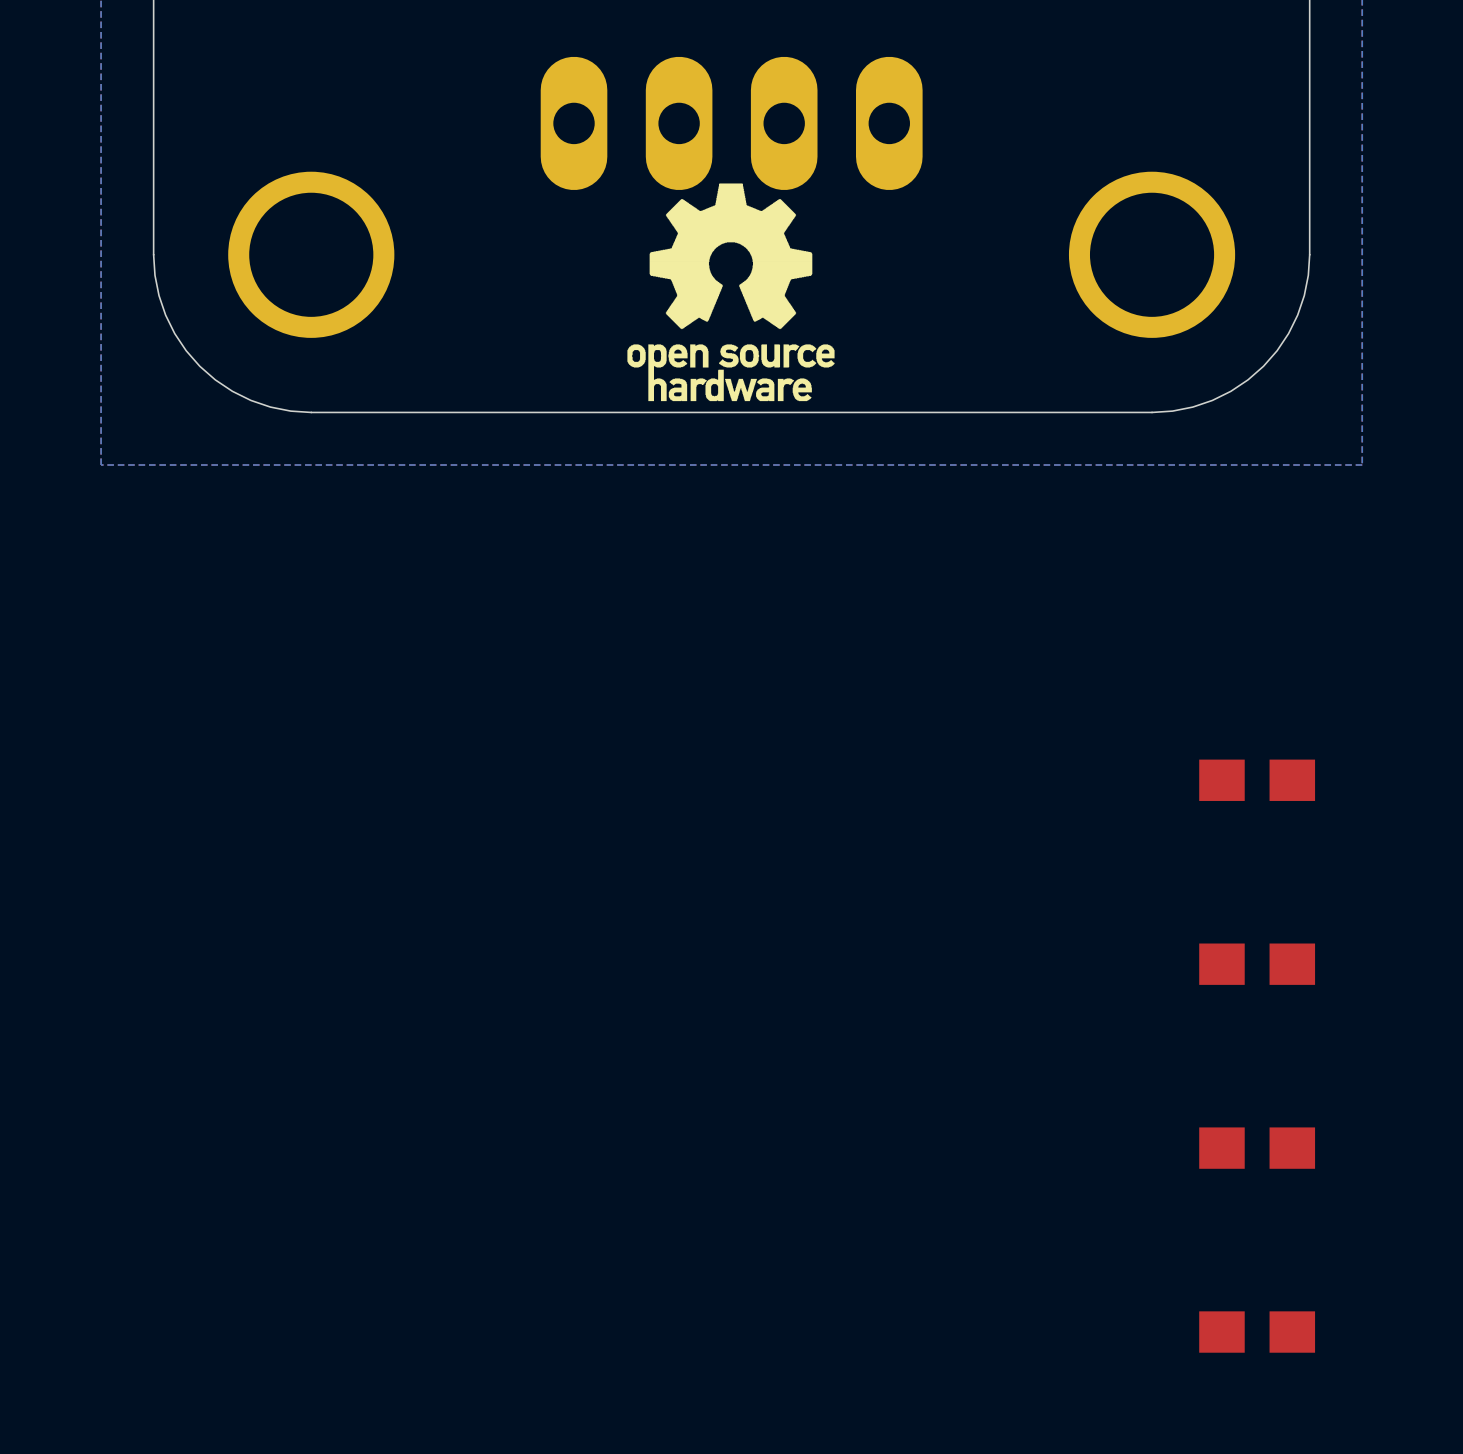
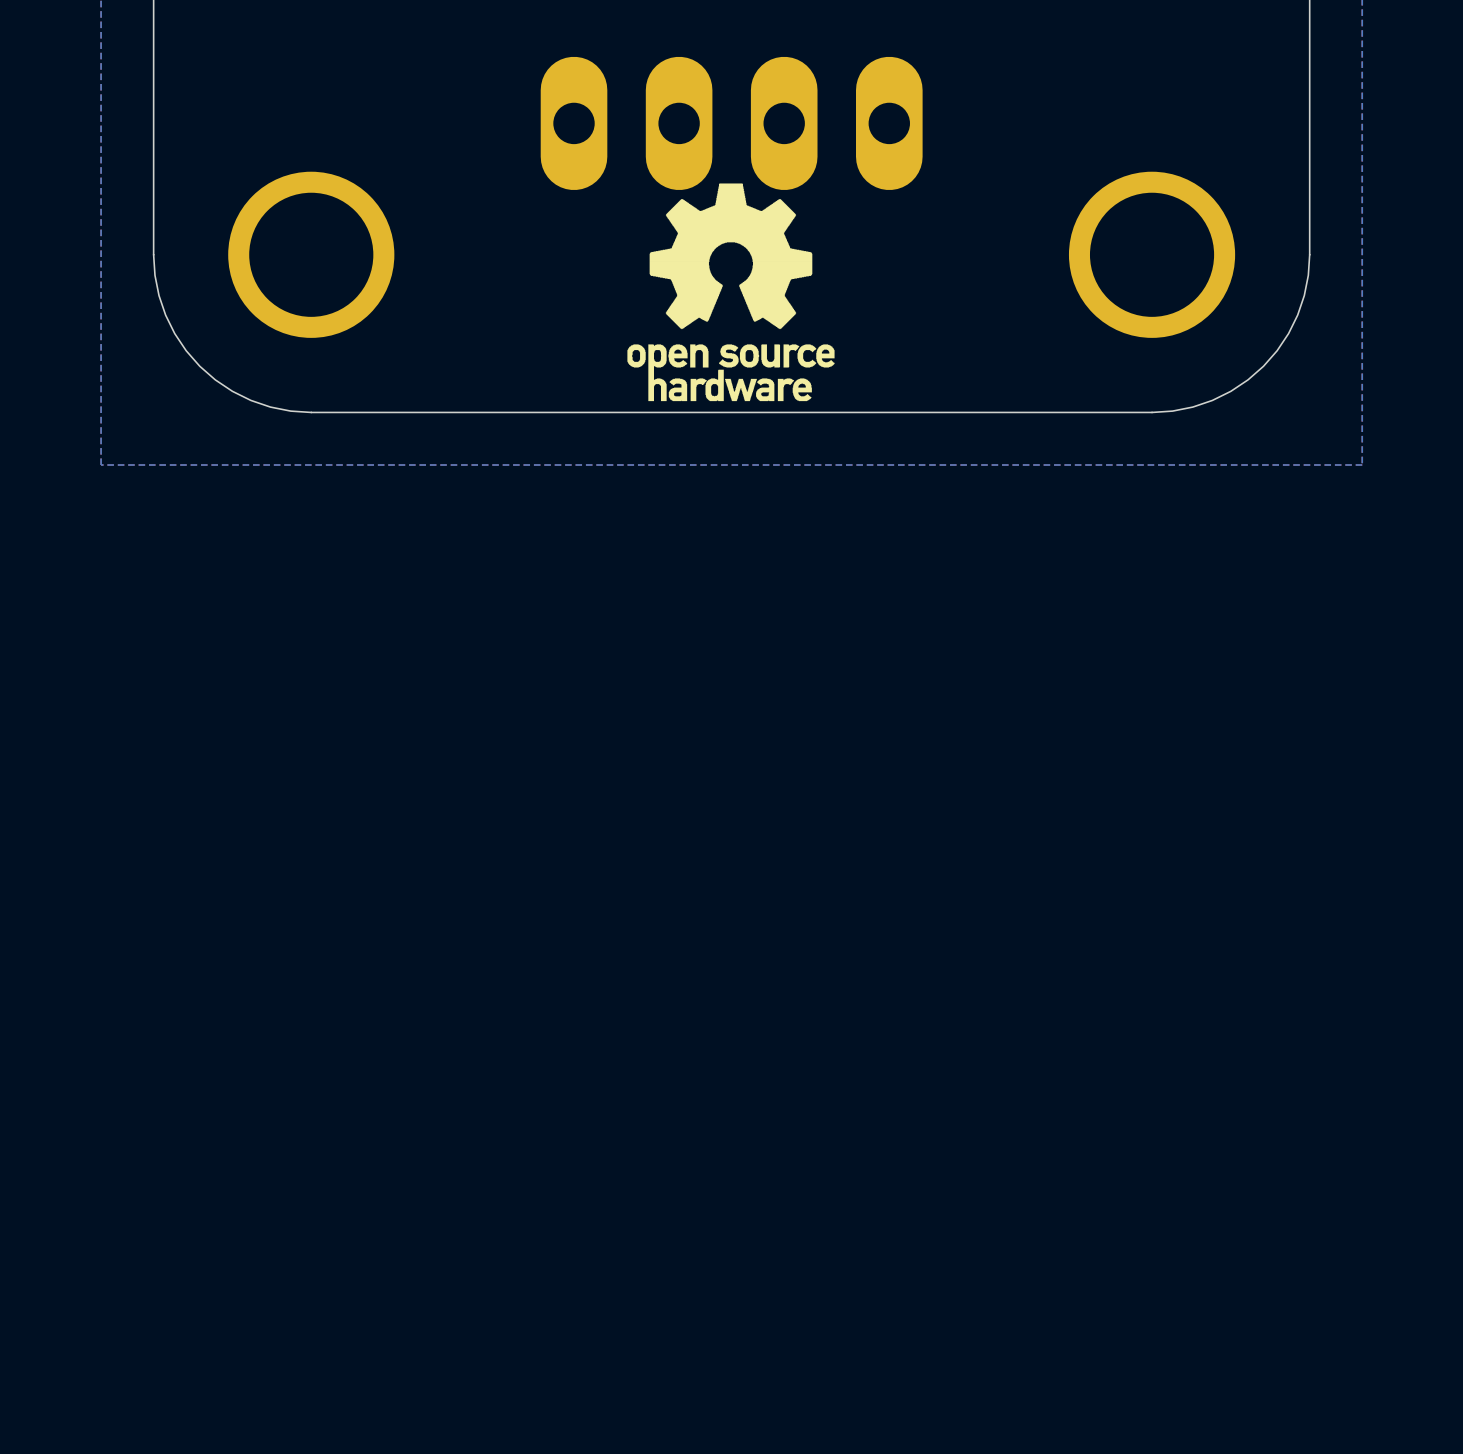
part: (1257, 780) -> none
part: (1257, 964) -> none
part: (1257, 1148) -> none
part: (1257, 1332) -> none

